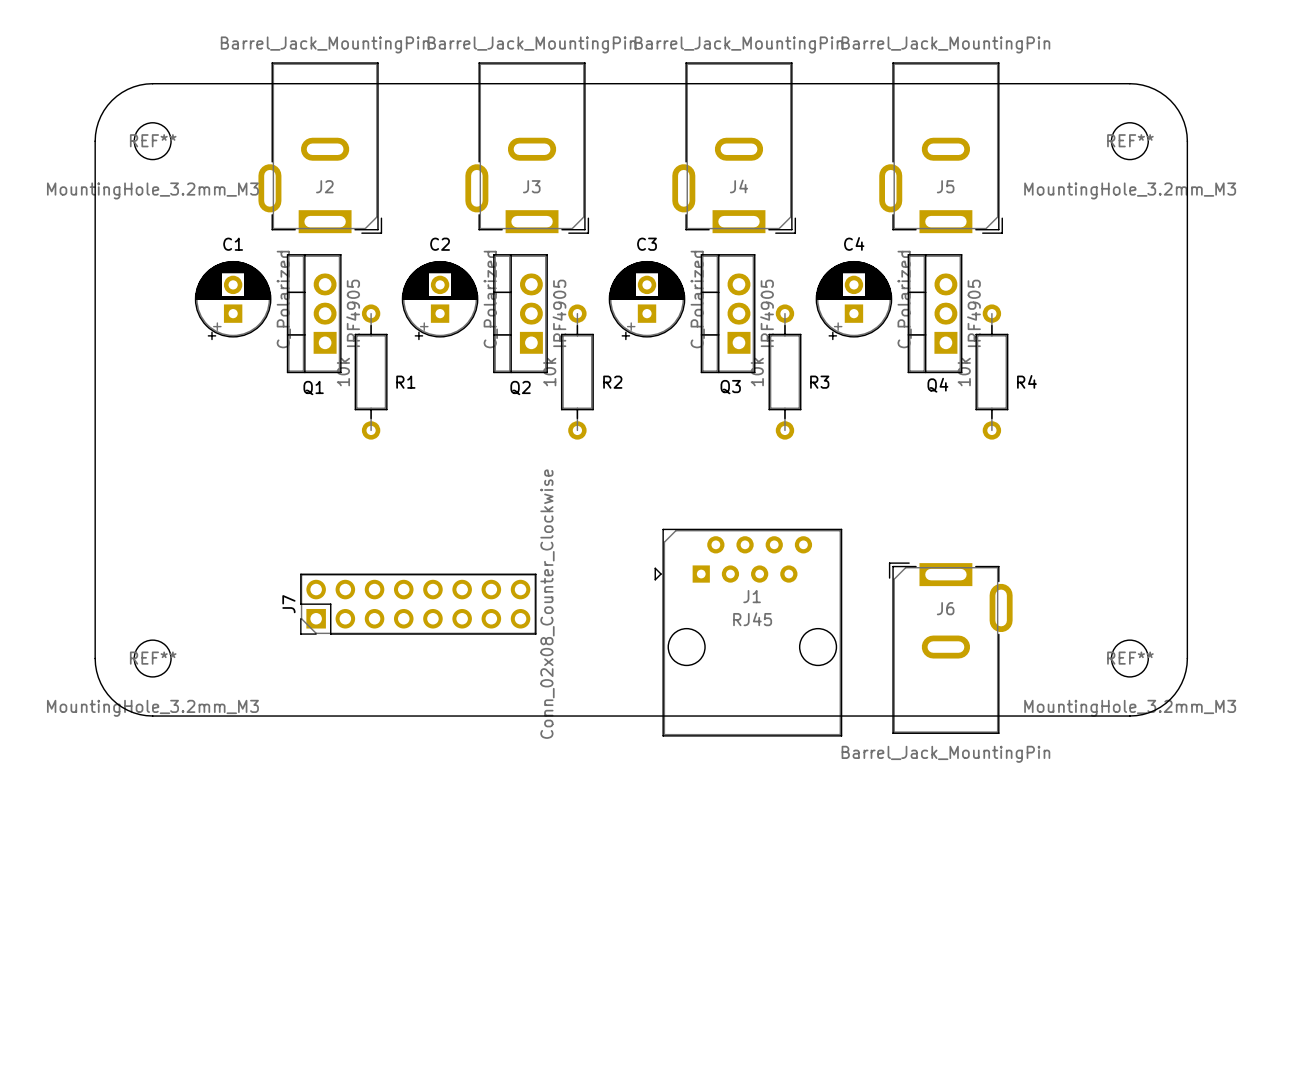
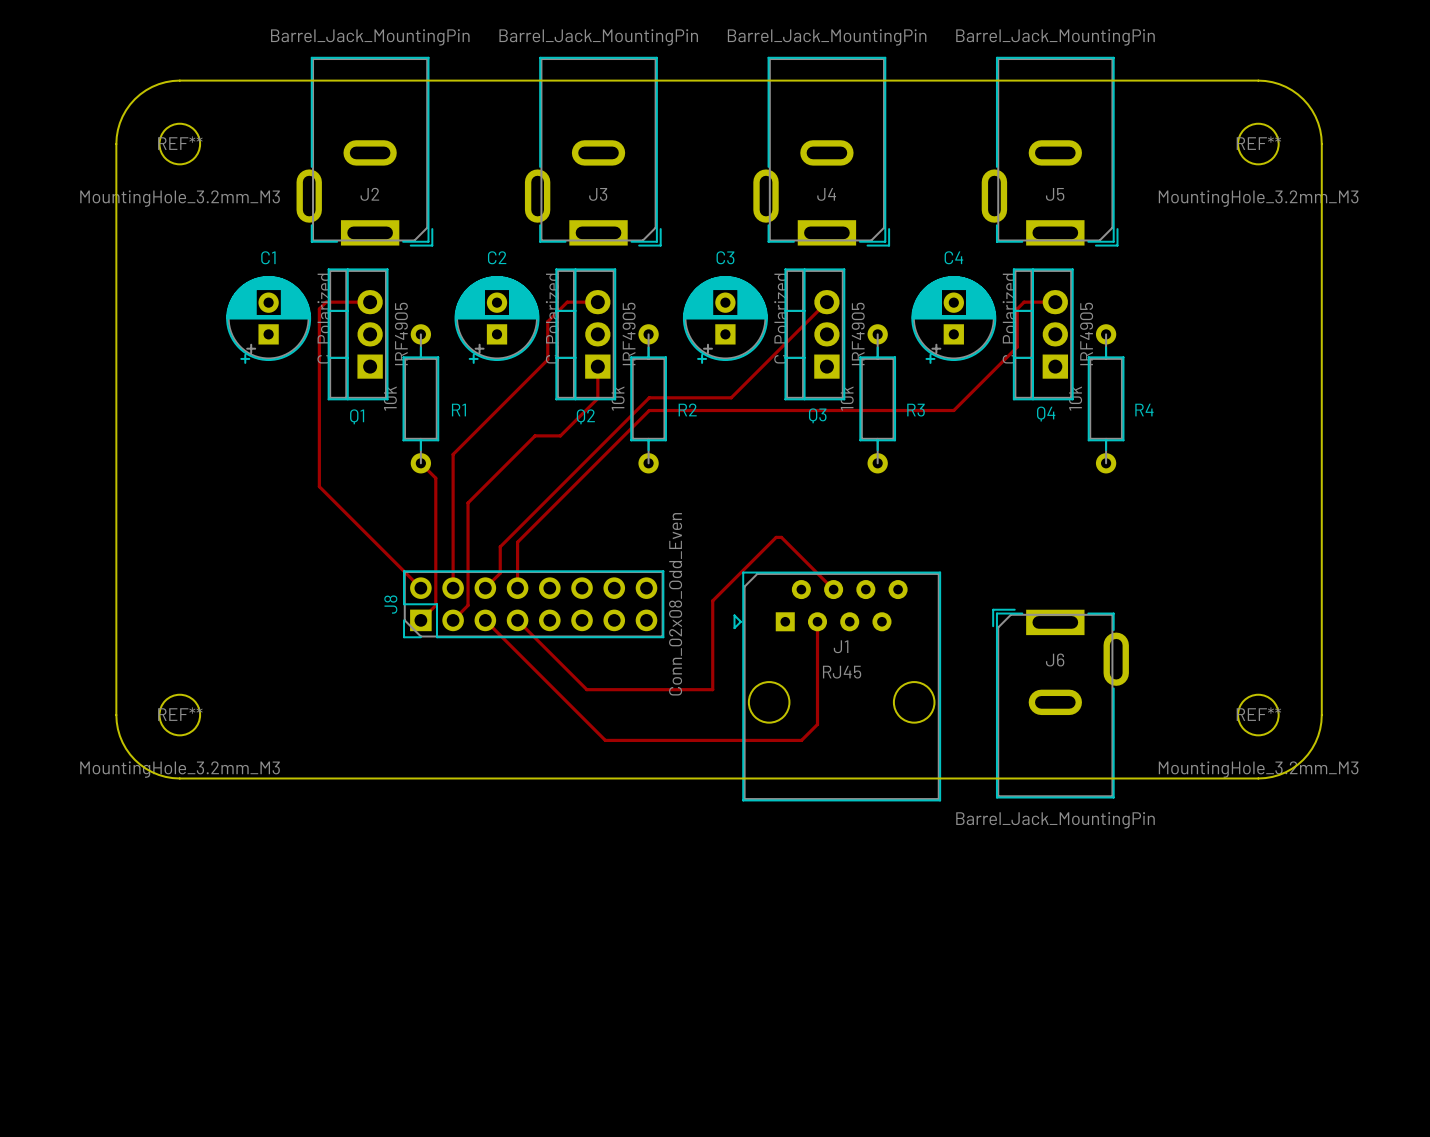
track: none -> (370, 302) (326, 302) (319, 309) (319, 486) (420, 588)
track: none -> (597, 302) (567, 302) (547, 321) (547, 359) (453, 454) (453, 588)
track: none -> (826, 302) (731, 397) (649, 397) (500, 546) (500, 573) (485, 588)
track: none -> (1055, 302) (1024, 302) (1017, 309) (1017, 347) (953, 410) (649, 410) (517, 542) (517, 588)
track: none -> (597, 366) (597, 398) (560, 435) (535, 435) (468, 502) (468, 605) (453, 620)
track: none -> (420, 463) (435, 478) (435, 605) (420, 620)
track: none -> (833, 589) (781, 537) (776, 537) (712, 600) (712, 689) (586, 689) (517, 620)
J8: none -> Conn_02x08_Odd_Even (533, 604)
track: none -> (485, 620) (605, 740) (801, 740) (817, 724) (817, 621) (814, 621)
J7: Conn_02x08_Counter_Clockwise (418, 604) -> none

